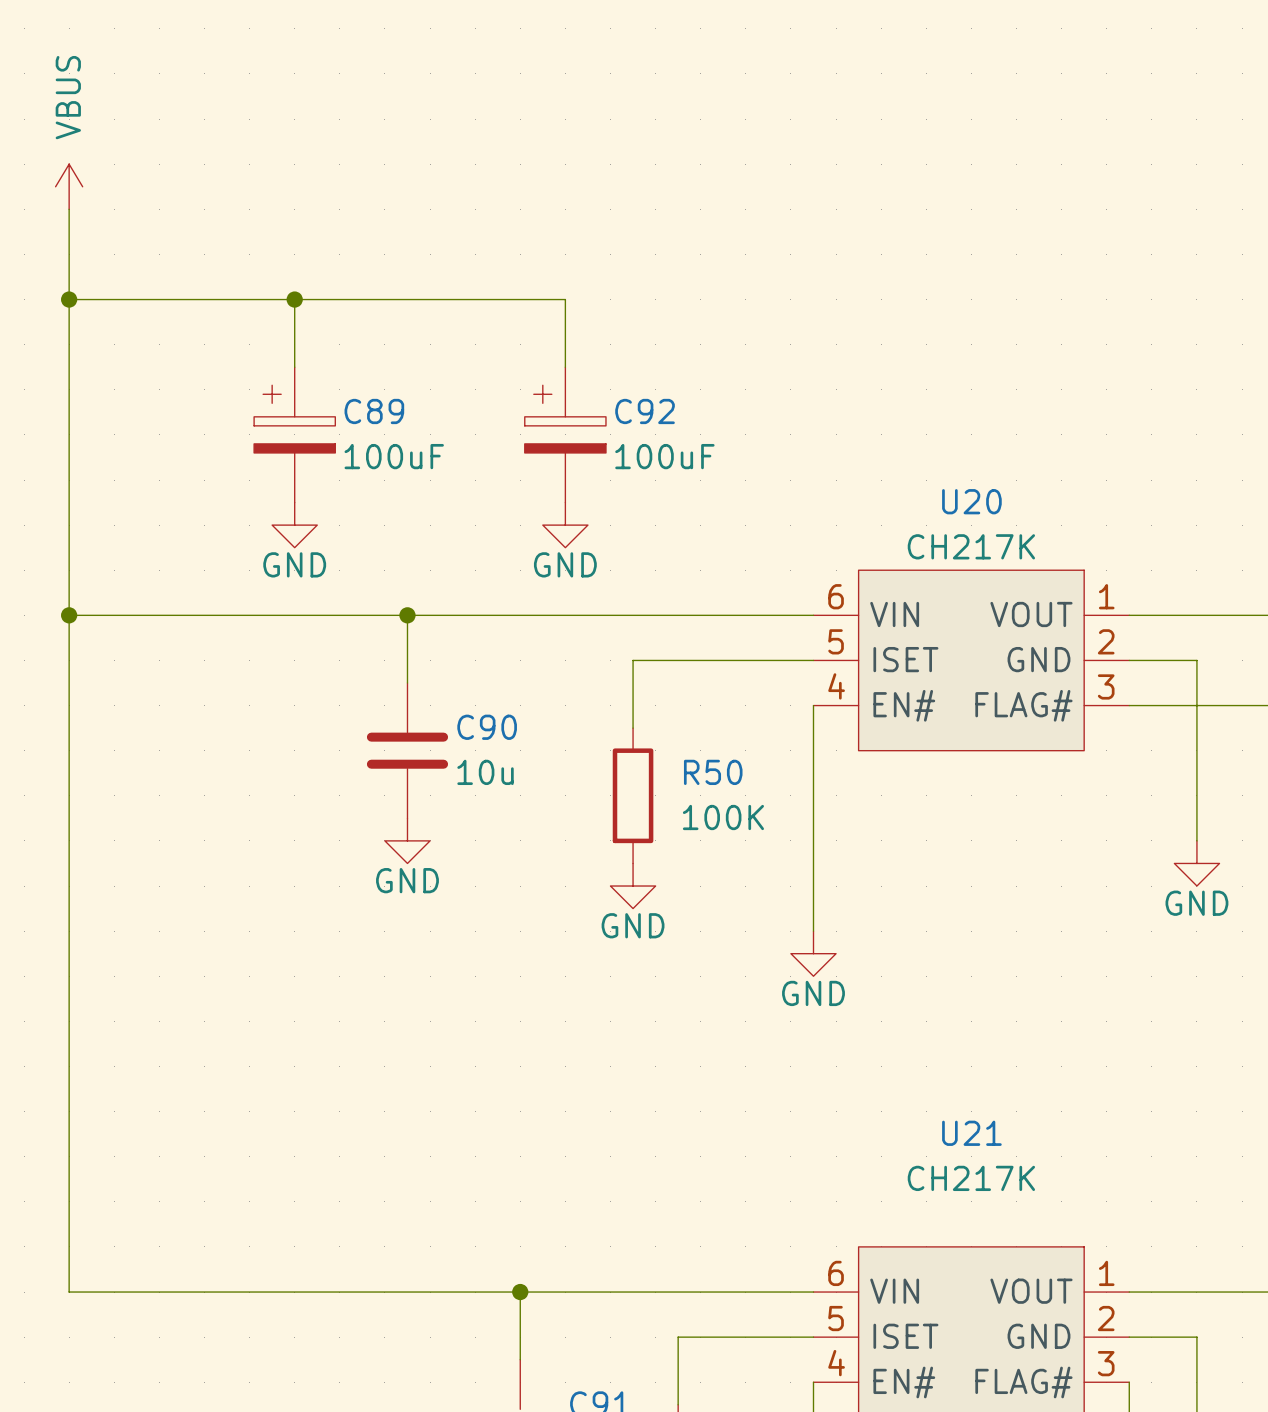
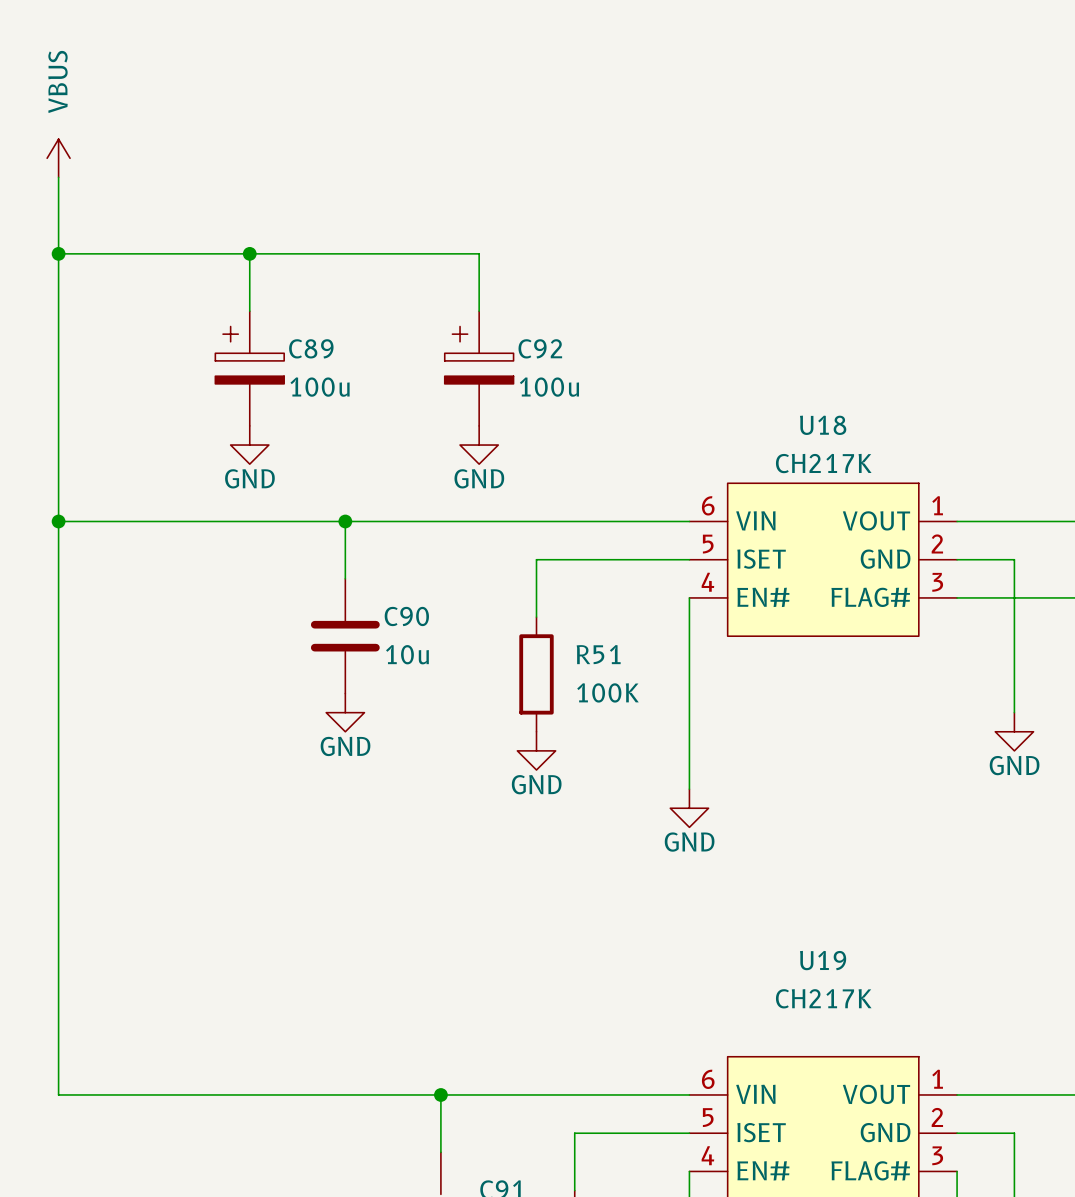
C89 value: 100uF (394, 456) -> 100u (320, 387)
C92 value: 100uF (664, 456) -> 100u (549, 387)
U20 name: U20 (971, 501) -> U18 (823, 425)
R50 name: R50 (713, 772) -> R51 (598, 654)
U21 name: U21 (971, 1133) -> U19 (823, 960)

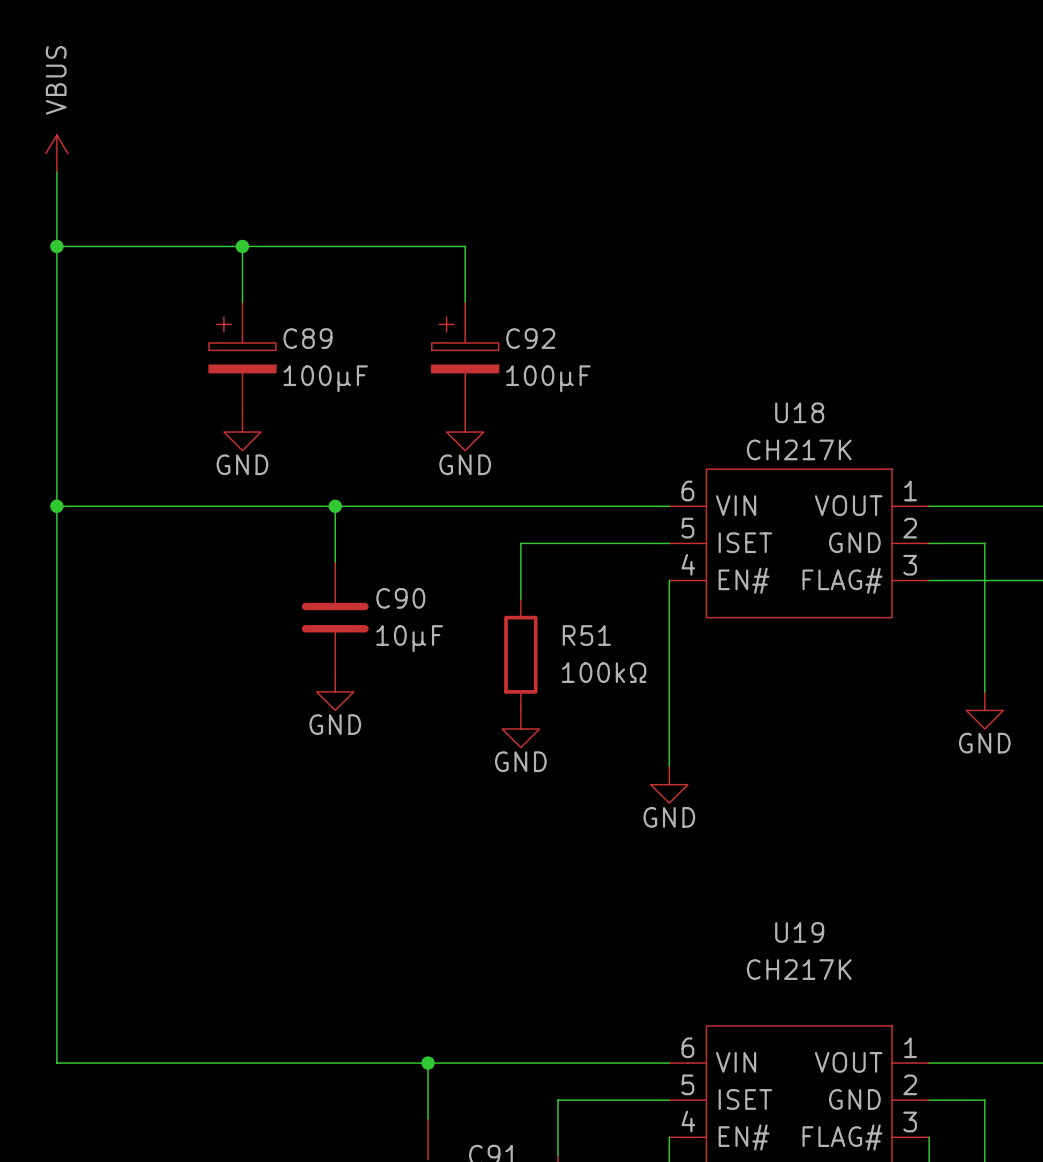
C89 value: 100u (320, 387) -> 100µF (325, 378)
C92 value: 100u (549, 387) -> 100µF (548, 378)
C90 value: 10u (407, 654) -> 10µF (409, 638)
R51 value: 100K (607, 692) -> 100kΩ (604, 672)

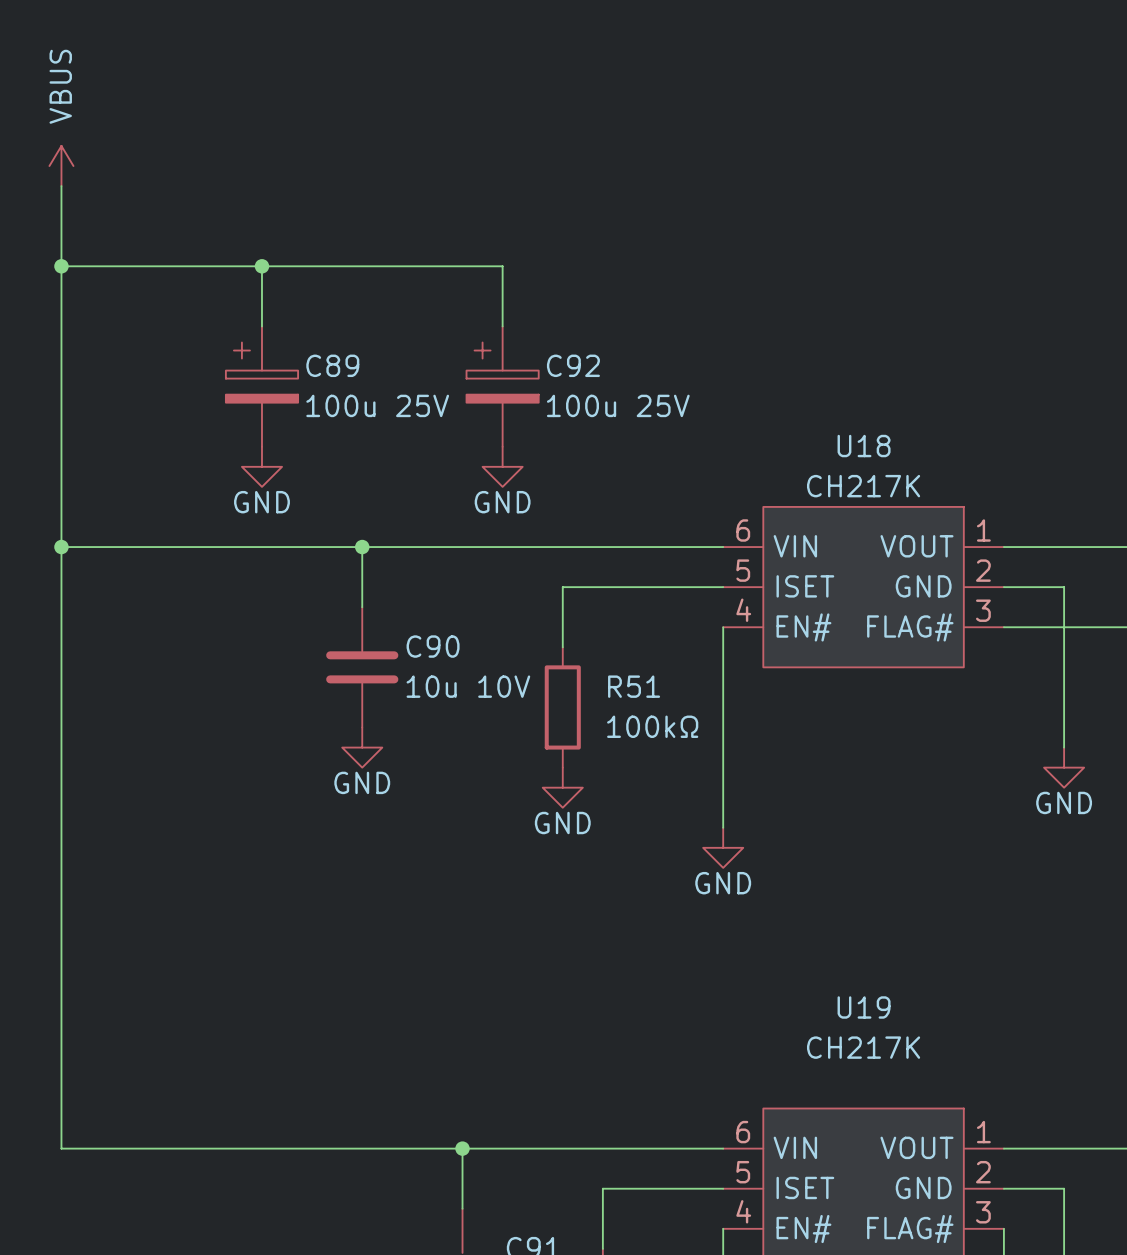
C89 value: 100µF (325, 378) -> 100u 25V (377, 405)
C92 value: 100µF (548, 378) -> 100u 25V (618, 405)
C90 value: 10µF (409, 638) -> 10u 10V (468, 686)

